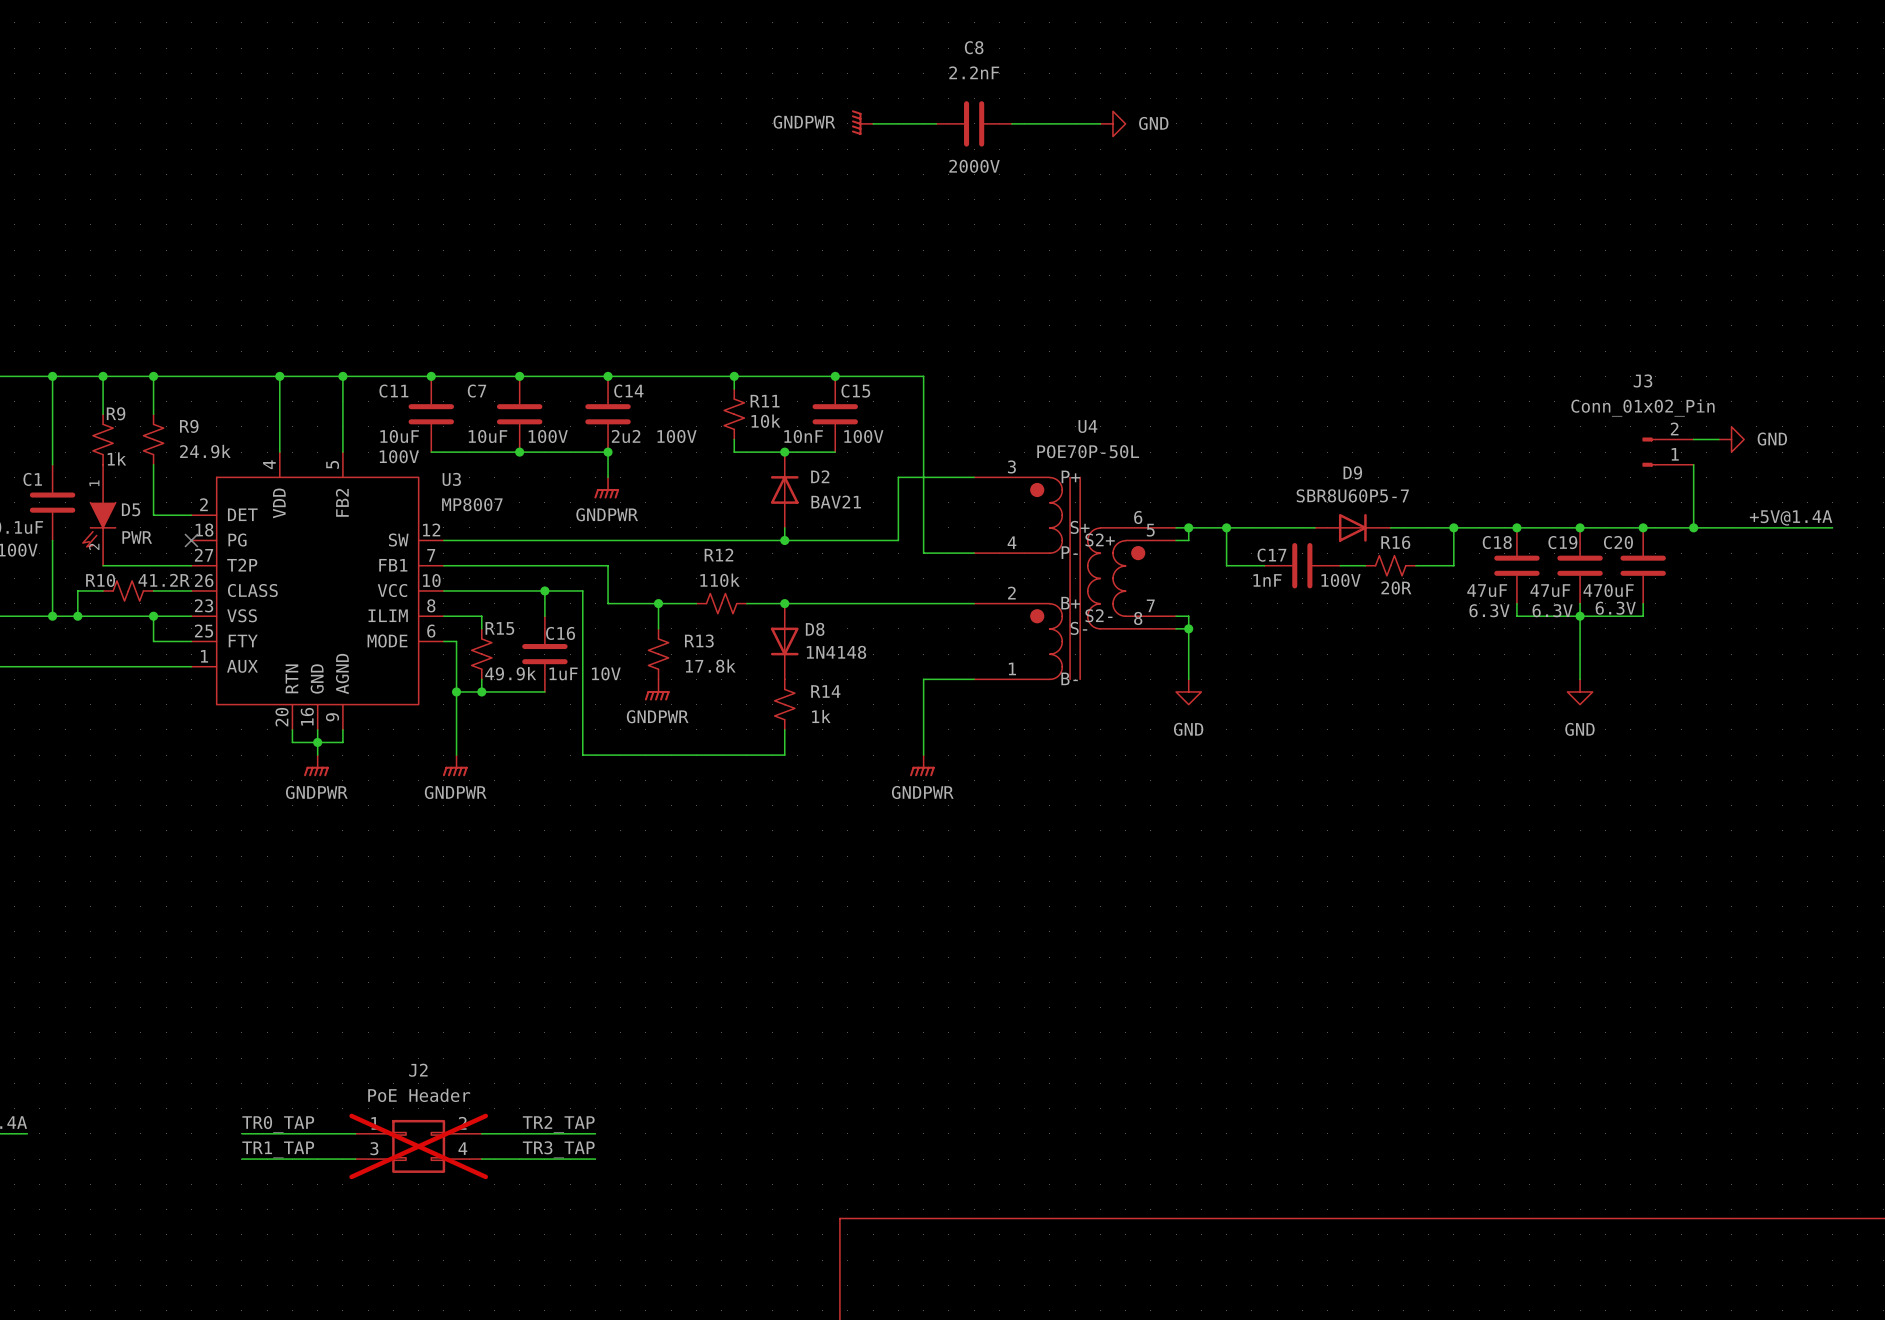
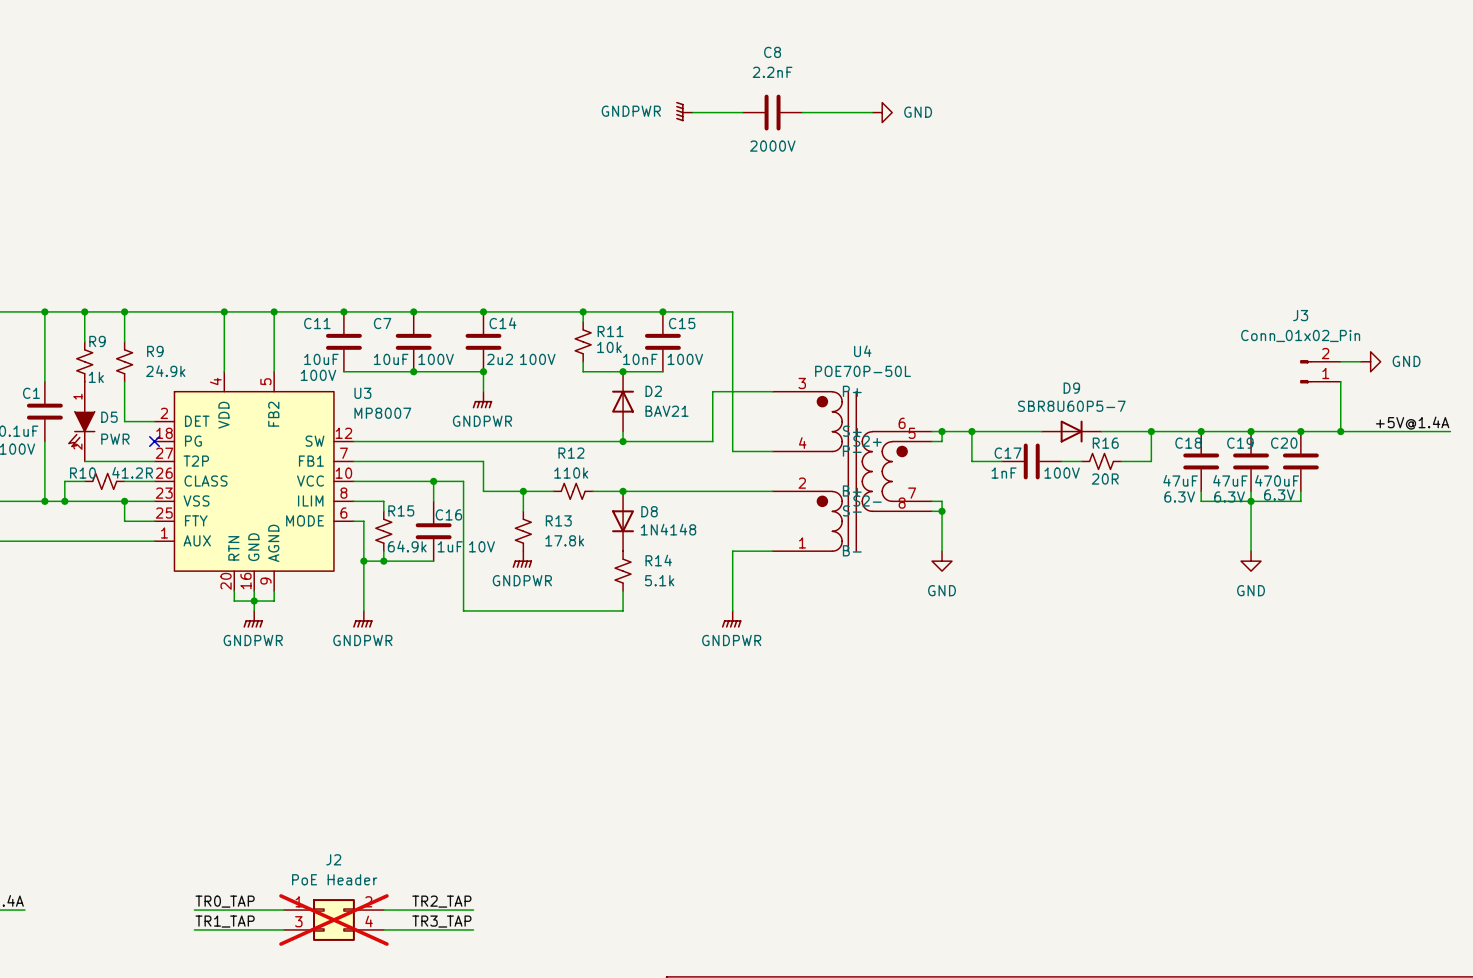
R15 value: 49.9k (510, 673) -> 64.9k (407, 546)
R14 value: 1k (821, 716) -> 5.1k (659, 580)

